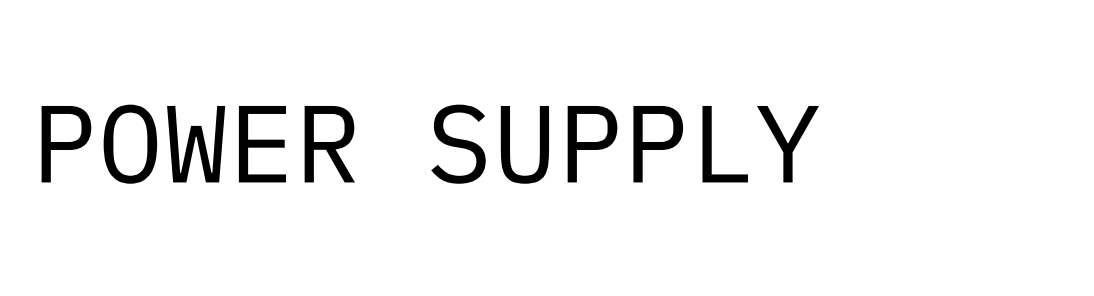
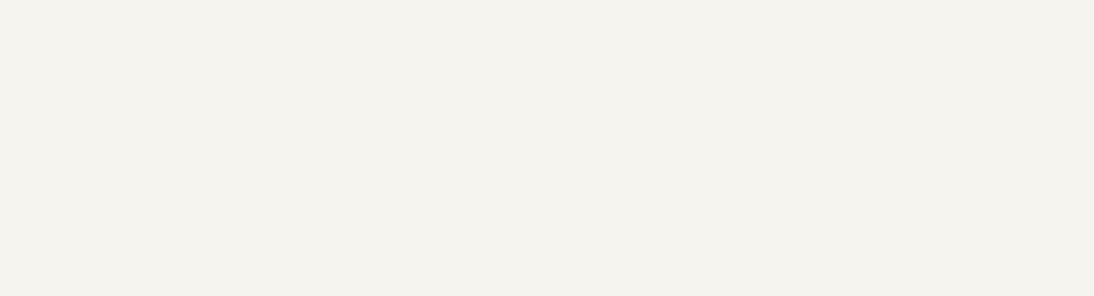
text: POWER SUPPLY (430, 144) -> none

